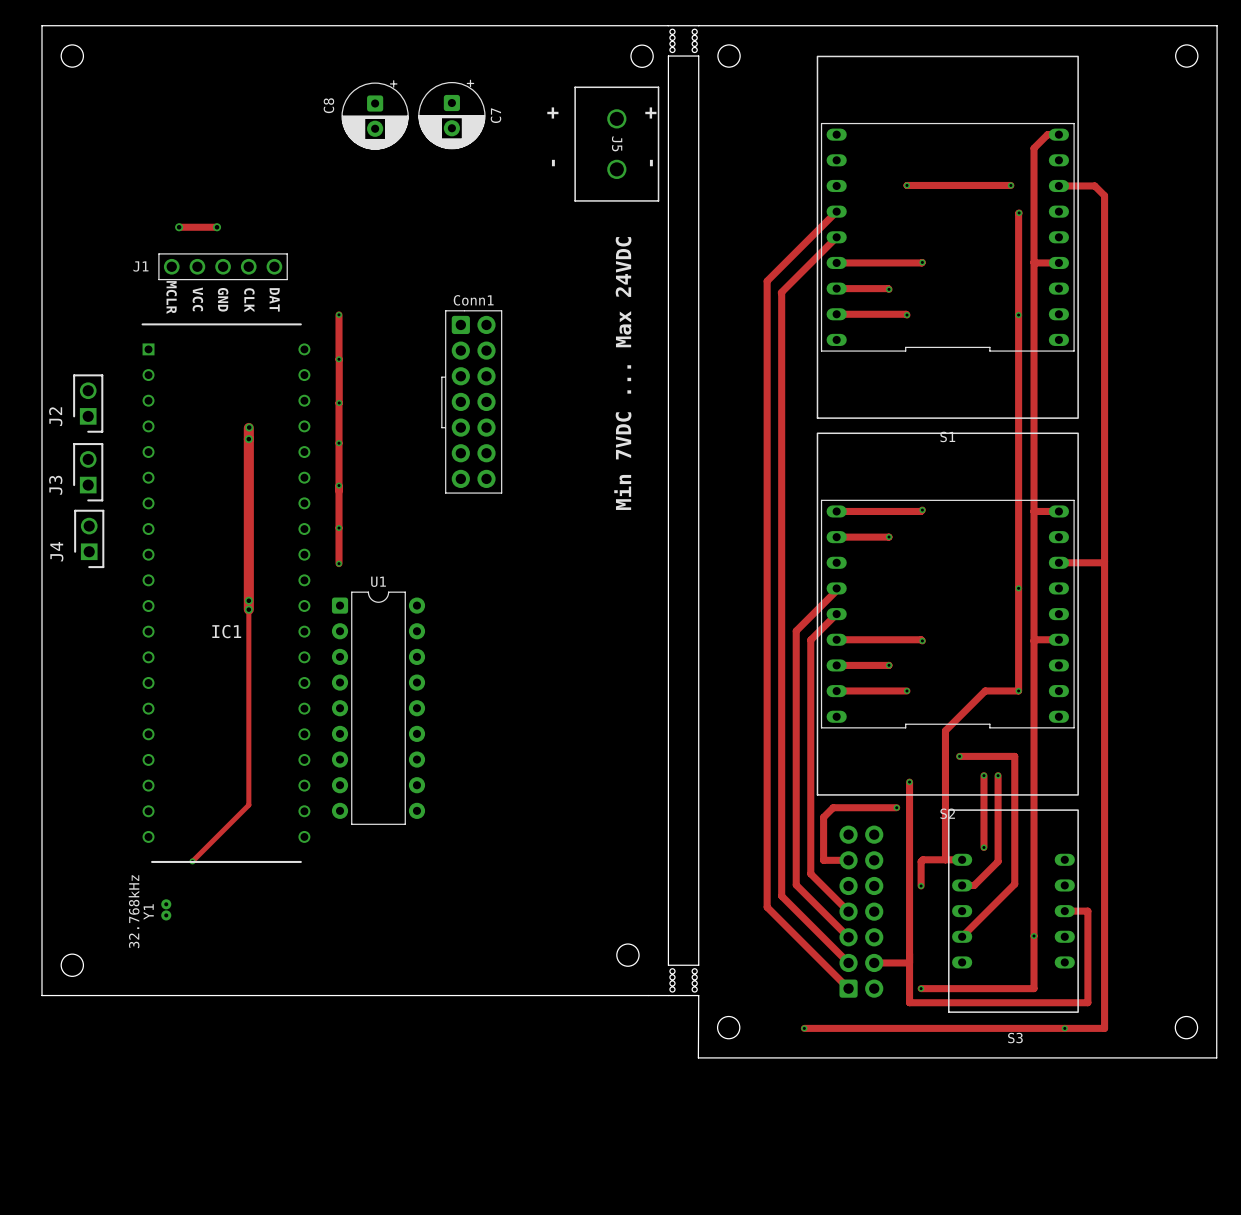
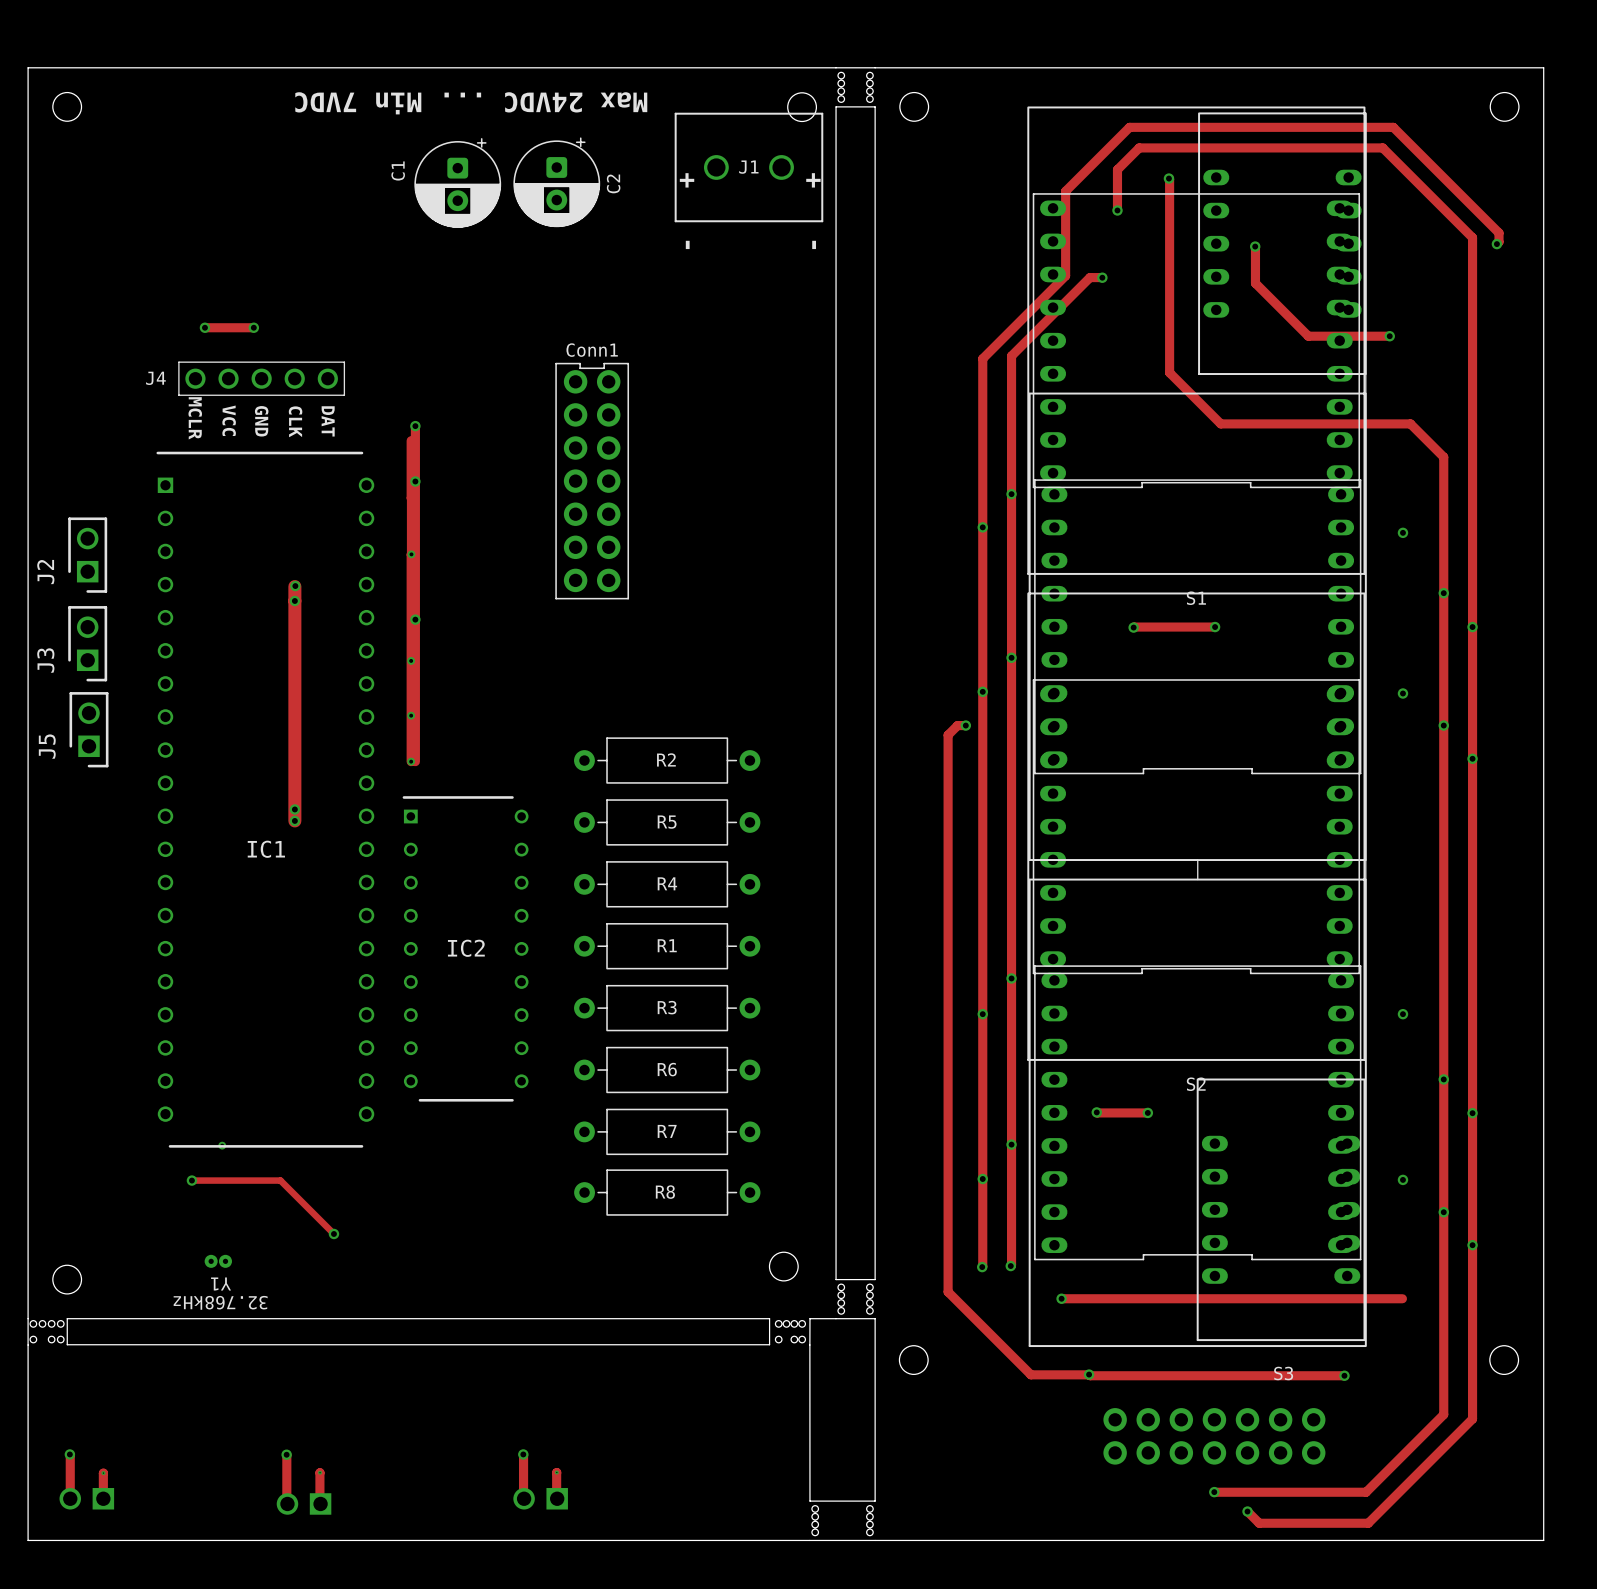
board edge: (1217, 25) (1216, 1057) (698, 1057) (698, 995) -> (1543, 67) (1543, 1540) (28, 1540) (28, 1318)
text: none -> Max 24VDC ... Min 7VDC (471, 103)
J1: none -> (748, 167)
C8 name: C8 (328, 105) -> C1 (398, 171)
track: none -> (1168, 178) (1169, 372) (1220, 423) (1410, 423) (1443, 457) (1443, 1414) (1366, 1492) (1214, 1492)
via: none -> (1168, 178)
C7 name: C7 (495, 115) -> C2 (613, 183)
track: (1058, 134) (1047, 134) (1034, 148) (1034, 988) (921, 988) -> none
track: none -> (1117, 210) (1117, 169) (1139, 147) (1382, 147) (1472, 237) (1472, 1419) (1368, 1523) (1259, 1523) (1247, 1511)
via: none -> (1117, 210)
J5: (616, 144) -> none
track: none -> (1496, 244) (1499, 242) (1499, 233) (1393, 127) (1129, 127) (1065, 191) (1065, 275) (982, 358) (982, 1267)
via: none -> (1496, 244)
track: none -> (1255, 246) (1255, 283) (1308, 336) (1389, 336)
via: none -> (1255, 246)
track: (906, 185) (1010, 185) -> none
via: (906, 185) -> none
via: (1010, 185) -> none
track: (1058, 185) (1094, 185) (1104, 195) (1104, 1028) (804, 1028) -> none
track: none -> (1102, 277) (1089, 277) (1011, 356) (1010, 1266)
via: none -> (1102, 277)
track: (836, 211) (767, 281) (767, 907) (848, 988) -> none
track: (1019, 212) (1018, 690) (985, 690) (945, 730) (945, 859) -> none
via: (1019, 212) -> none
via: none -> (1389, 336)
track: (836, 237) (781, 292) -> none
track: (922, 262) (836, 262) -> none
via: (922, 262) -> none
track: (1034, 262) (1058, 262) -> none
J1 name: J1 (140, 266) -> J4 (155, 378)
track: (836, 288) (889, 289) -> none
via: (889, 289) -> none
track: (781, 292) (781, 896) (848, 962) -> none
track: none -> (415, 426) (415, 761)
via: none -> (415, 426)
Conn1 footprint: [441, 310, 503, 494] -> [555, 362, 630, 600]
via: (339, 314) -> none
track: (836, 314) (906, 315) -> none
via: (906, 315) -> none
via: (1018, 315) -> none
via: none -> (415, 481)
via: none -> (1011, 494)
via: (339, 359) -> none
text: Min 7VDC ... Max 24VDC (622, 373) -> none
via: none -> (982, 527)
via: none -> (1402, 532)
via: none -> (1443, 593)
via: (339, 443) -> none
via: none -> (415, 619)
via: none -> (1133, 627)
track: none -> (1215, 627) (1133, 627)
via: none -> (1215, 627)
via: none -> (1472, 627)
via: none -> (1011, 657)
via: none -> (982, 691)
track: (922, 510) (836, 511) -> none
via: (922, 510) -> none
via: none -> (1402, 693)
track: (1034, 511) (1058, 511) -> none
track: none -> (965, 725) (957, 725) (948, 735) (948, 1291) (1030, 1374) (1344, 1375)
via: none -> (965, 725)
via: none -> (1443, 725)
track: (836, 537) (888, 537) -> none
via: (889, 537) -> none
part: none -> (1197, 729)
J4 name: J4 (56, 551) -> J5 (47, 746)
track: (1104, 561) (1058, 562) -> none
via: none -> (1472, 758)
R2: none -> (667, 760)
track: (836, 588) (796, 631) (796, 884) (848, 937) -> none
via: (1018, 588) -> none
track: (248, 609) (248, 805) (192, 861) -> none
R5: none -> (667, 822)
track: (836, 614) (810, 640) (810, 873) (848, 911) -> none
track: (836, 639) (922, 640) -> none
track: (1058, 639) (1034, 640) -> none
via: (922, 640) -> none
R4: none -> (667, 884)
track: (836, 665) (888, 665) -> none
via: (889, 665) -> none
track: (836, 690) (906, 690) -> none
via: (906, 690) -> none
via: (1018, 690) -> none
R1: none -> (667, 946)
U1: (378, 708) -> none
IC2: none -> (465, 948)
via: none -> (1011, 978)
R3: none -> (667, 1008)
track: (959, 756) (1014, 756) (1014, 884) (962, 936) -> none
via: (959, 756) -> none
via: none -> (982, 1014)
via: none -> (1402, 1014)
track: (983, 775) (983, 847) -> none
via: (983, 775) -> none
track: (998, 775) (998, 861) (974, 885) (962, 885) -> none
via: (998, 775) -> none
track: (909, 782) (909, 1002) (1087, 1002) (1087, 911) (1064, 911) -> none
via: (909, 782) -> none
R6: none -> (667, 1070)
track: (896, 807) (833, 807) (823, 817) (823, 860) (848, 860) -> none
via: (896, 807) -> none
via: none -> (1443, 1079)
track: none -> (1096, 1112) (1147, 1112)
via: none -> (1096, 1112)
via: none -> (1147, 1112)
via: none -> (1472, 1113)
via: (983, 847) -> none
R7: none -> (667, 1131)
track: (962, 859) (922, 859) (921, 861) (921, 885) -> none
via: none -> (1011, 1144)
via: (921, 885) -> none
via: none -> (982, 1179)
via: none -> (1402, 1179)
track: none -> (191, 1180) (280, 1180) (333, 1233)
via: none -> (191, 1180)
R8: none -> (667, 1192)
Y1 rotation: 0° (166, 909) -> 90° counterclockwise (218, 1261)
Y1 position: (166, 909) -> (218, 1261)
part: (861, 911) -> none
via: none -> (1443, 1212)
via: none -> (333, 1233)
via: (1034, 936) -> none
via: none -> (1472, 1245)
via: none -> (1010, 1266)
via: none -> (982, 1267)
track: (874, 962) (909, 962) -> none
track: none -> (1061, 1298) (1402, 1298)
via: none -> (1061, 1298)
via: (921, 988) -> none
board edge: (41, 995) (72, 995) -> (769, 1318) (769, 1344) (67, 1344) (67, 1318)
board edge: (616, 995) (648, 995) -> (875, 1318) (875, 1501) (809, 1501) (809, 1318)
part: none -> (33, 1323)
part: none -> (42, 1323)
part: none -> (51, 1323)
part: none -> (60, 1323)
part: none -> (778, 1323)
part: none -> (786, 1323)
part: none -> (794, 1323)
part: none -> (802, 1323)
part: none -> (33, 1339)
part: none -> (51, 1339)
part: none -> (60, 1339)
part: none -> (778, 1339)
part: none -> (794, 1339)
part: none -> (802, 1339)
via: (804, 1028) -> none
via: (1064, 1028) -> none
via: none -> (1089, 1374)
via: none -> (1344, 1375)
part: none -> (1214, 1436)
track: none -> (69, 1454) (70, 1498)
via: none -> (69, 1454)
track: none -> (523, 1454) (523, 1498)
via: none -> (523, 1454)
track: none -> (286, 1454) (286, 1498)
via: none -> (286, 1454)
via: none -> (320, 1472)
track: none -> (556, 1472) (556, 1498)
via: none -> (556, 1472)
track: none -> (103, 1473) (103, 1498)
via: none -> (103, 1473)
track: none -> (319, 1472) (319, 1498)
via: none -> (1214, 1492)
part: none -> (86, 1498)
part: none -> (540, 1498)
part: none -> (304, 1503)
part: none -> (815, 1508)
part: none -> (869, 1508)
via: none -> (1247, 1511)
part: none -> (815, 1516)
part: none -> (869, 1516)
part: none -> (815, 1524)
part: none -> (869, 1524)
part: none -> (815, 1532)
part: none -> (869, 1532)

